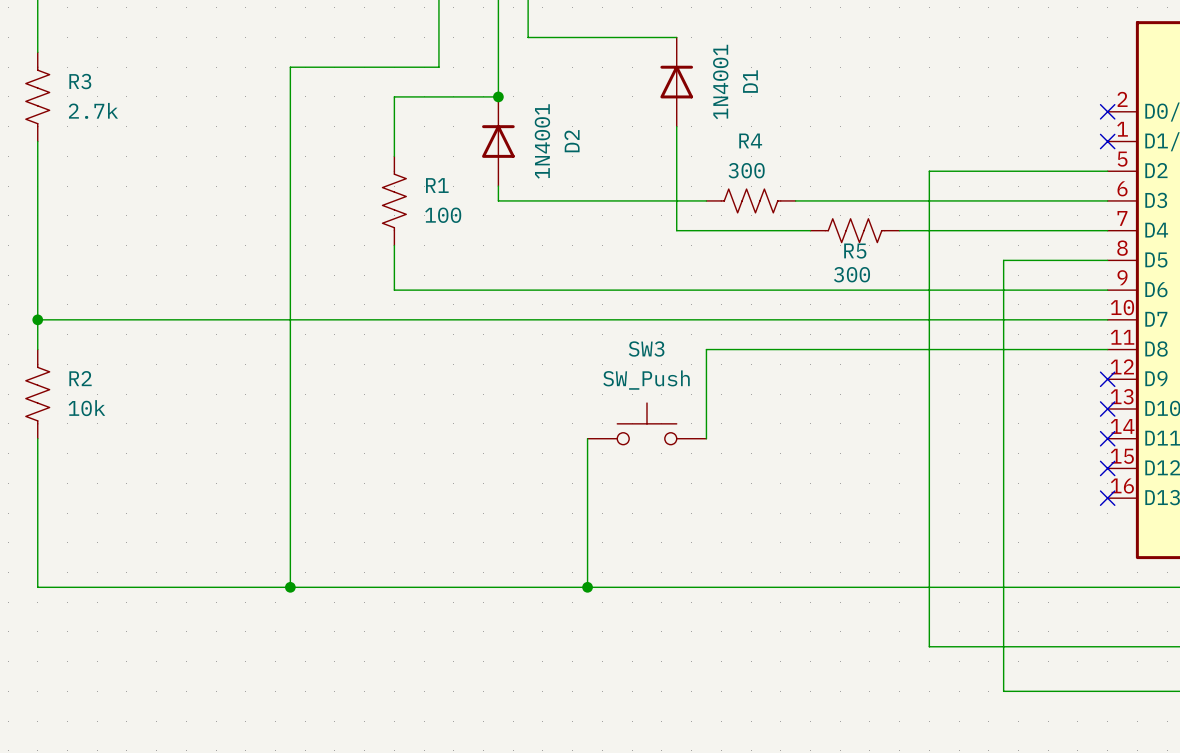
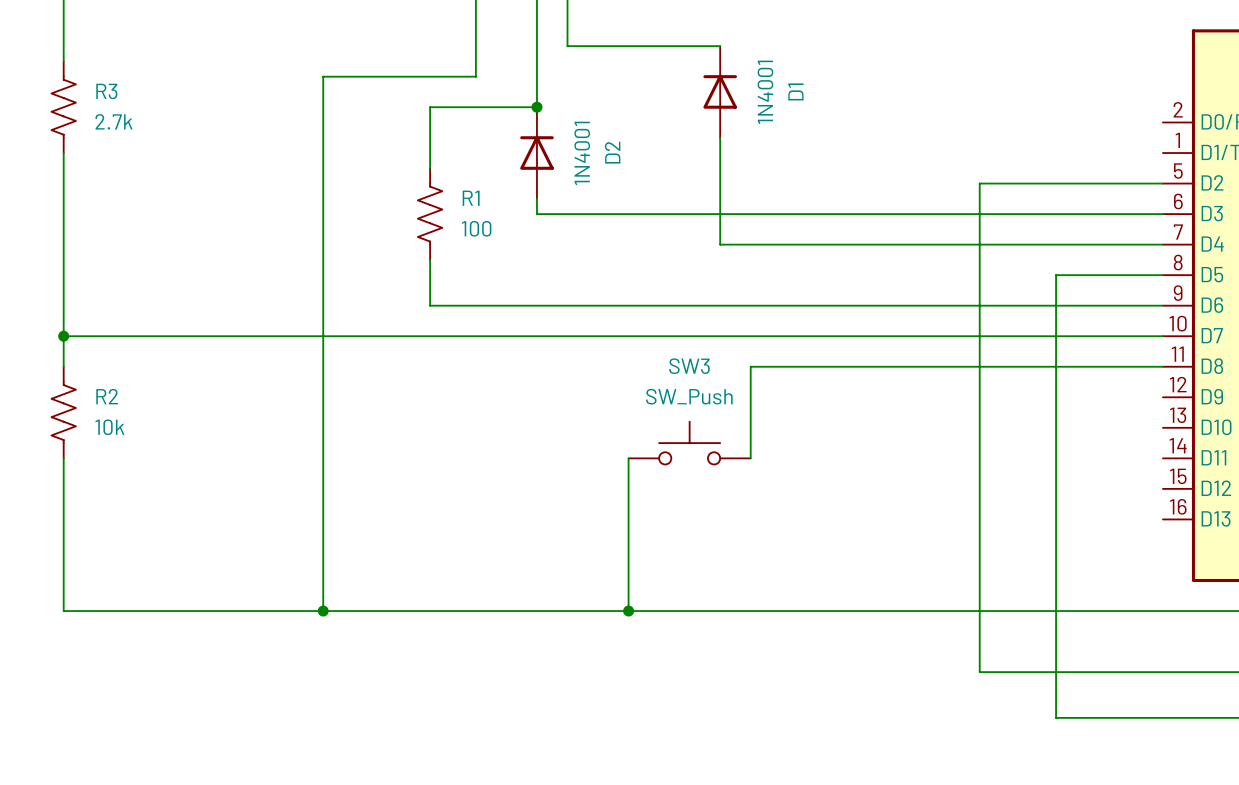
no-connect mark: (1107, 111) -> none
no-connect mark: (1107, 141) -> none
R4: 300 (751, 200) -> none
R5: 300 (855, 230) -> none
no-connect mark: (1107, 379) -> none
no-connect mark: (1107, 408) -> none
no-connect mark: (1107, 438) -> none
no-connect mark: (1107, 468) -> none
no-connect mark: (1107, 498) -> none

